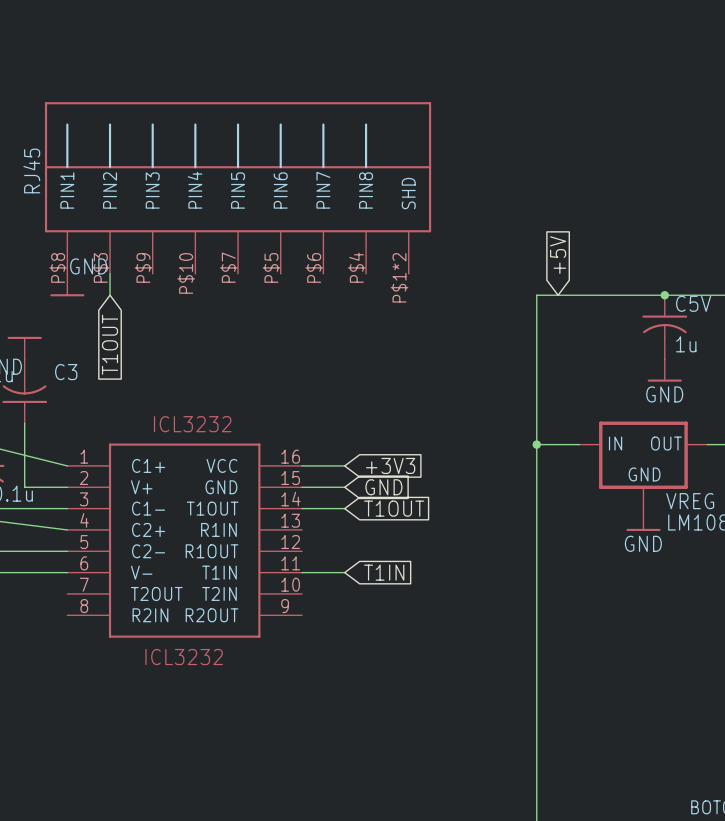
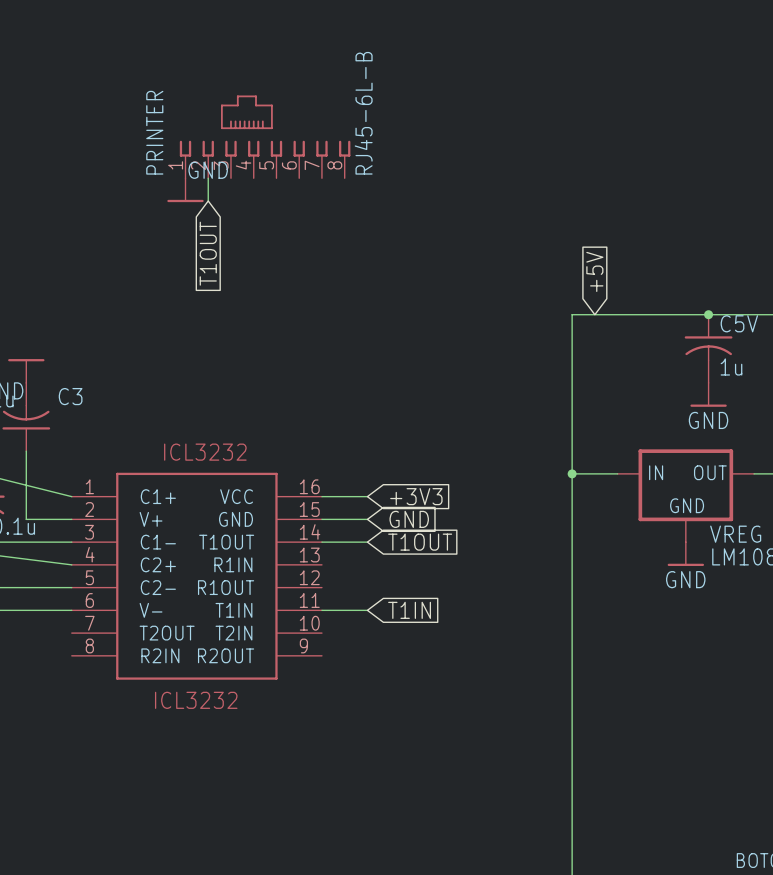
PRINTER: none -> RJ45-6L-B (265, 136)
part: (238, 188) -> none
wire: (110, 273) (110, 295) -> (208, 178) (208, 200)
power symbol position: GND (67, 285) -> GND (185, 190)
global label position: T1OUT (110, 344) -> T1OUT (208, 253)

